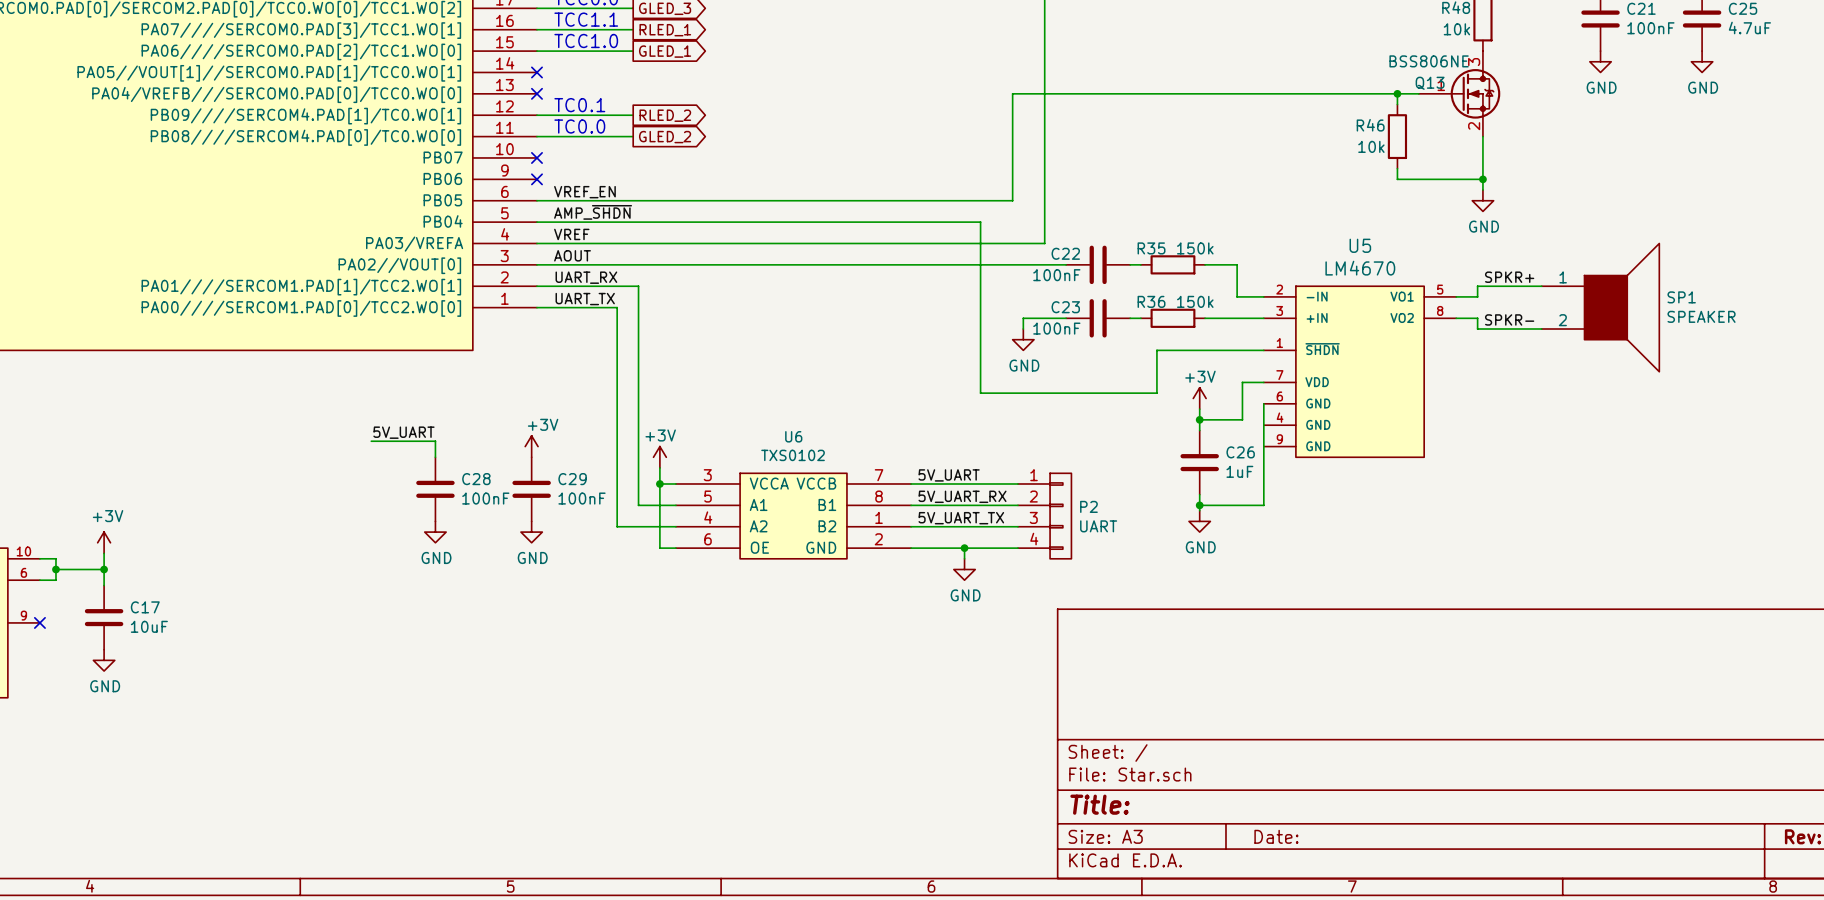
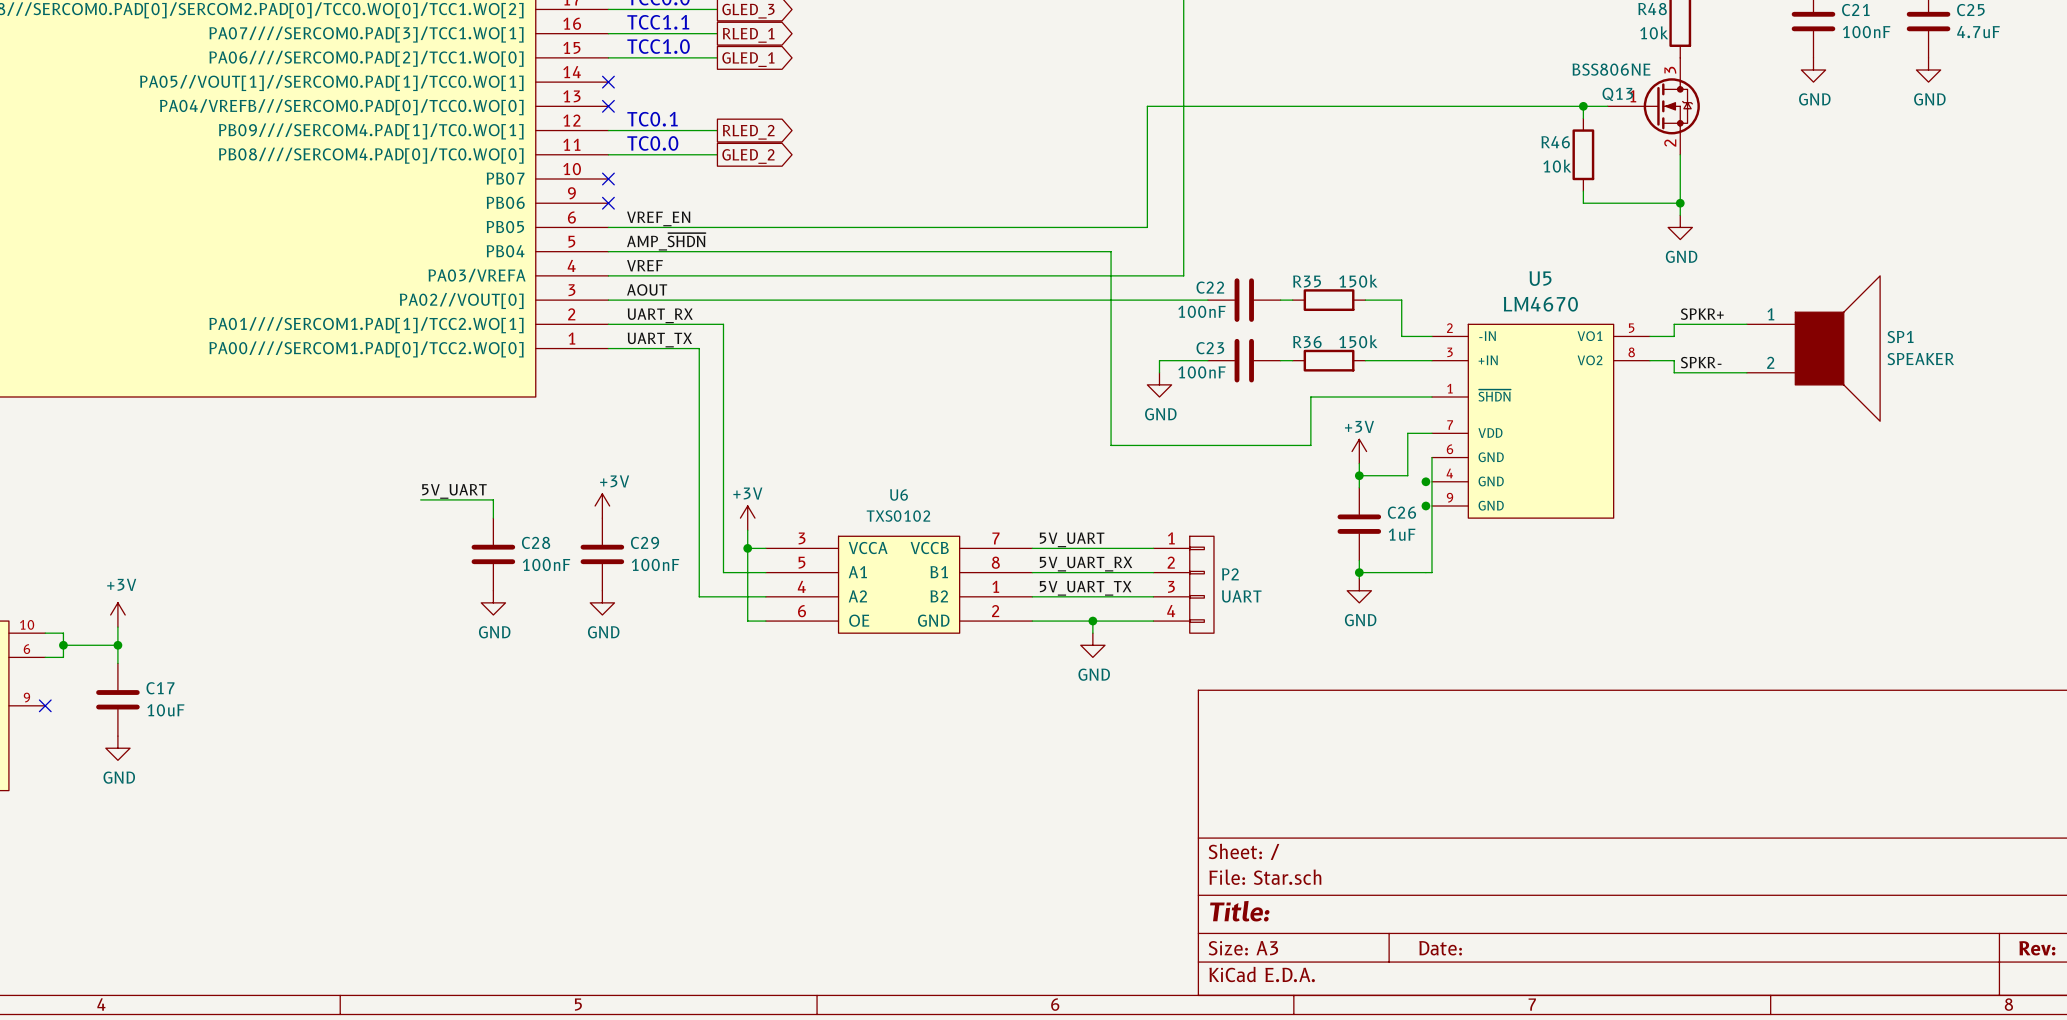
junction: none -> (1425, 481)
junction: none -> (1425, 506)

